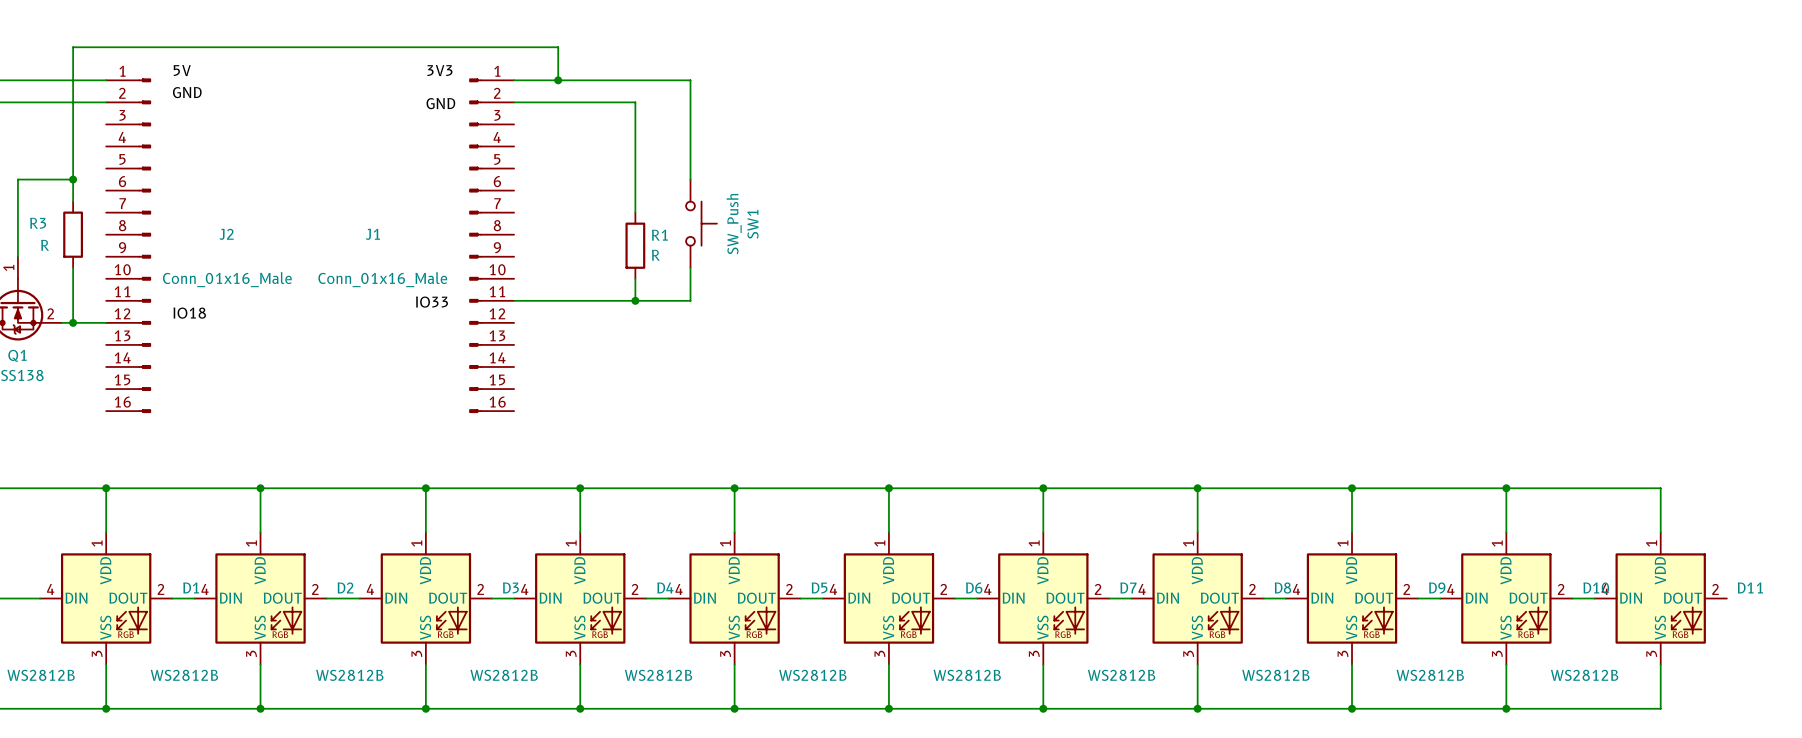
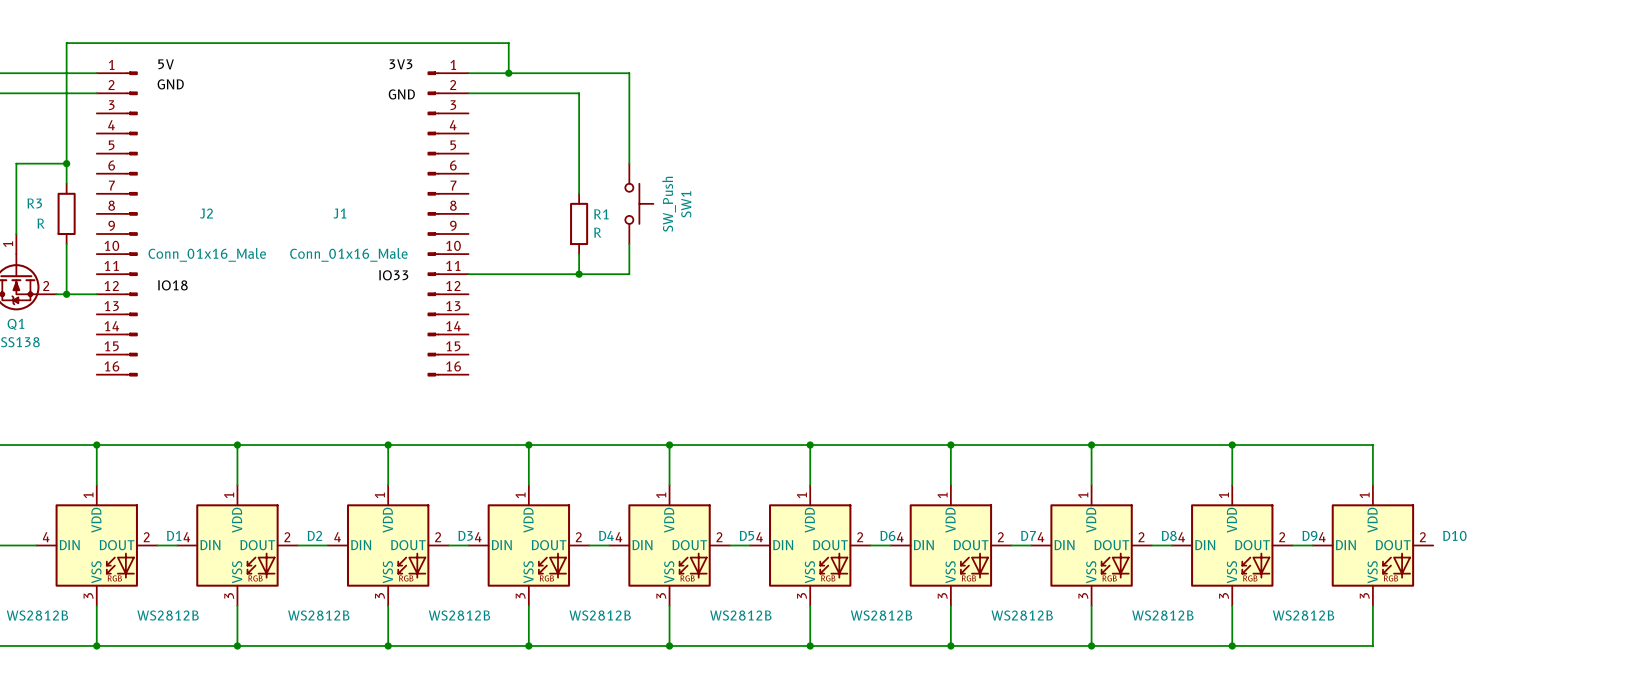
wire: (1506, 488) (1660, 488) (1660, 532) -> none
junction: (1506, 488) -> none
wire: (1572, 598) (1594, 598) -> none
D11: WS2812B (1660, 598) -> none
wire: (1660, 664) (1660, 708) (1506, 708) -> none
junction: (1506, 708) -> none

